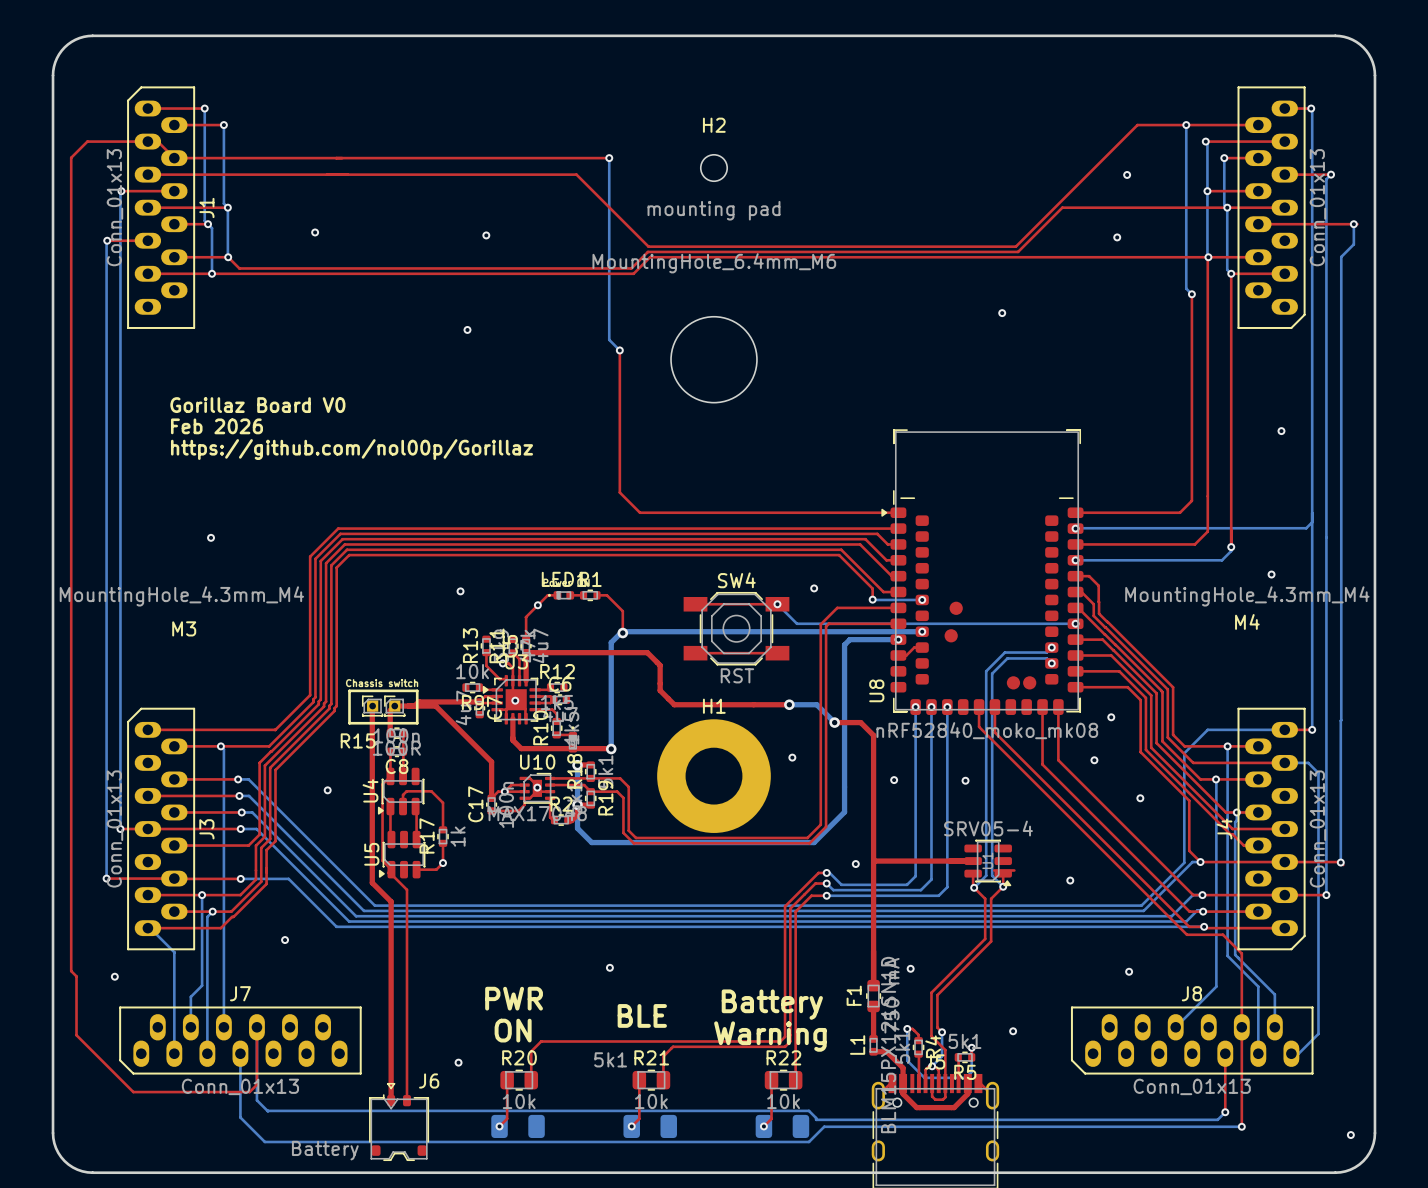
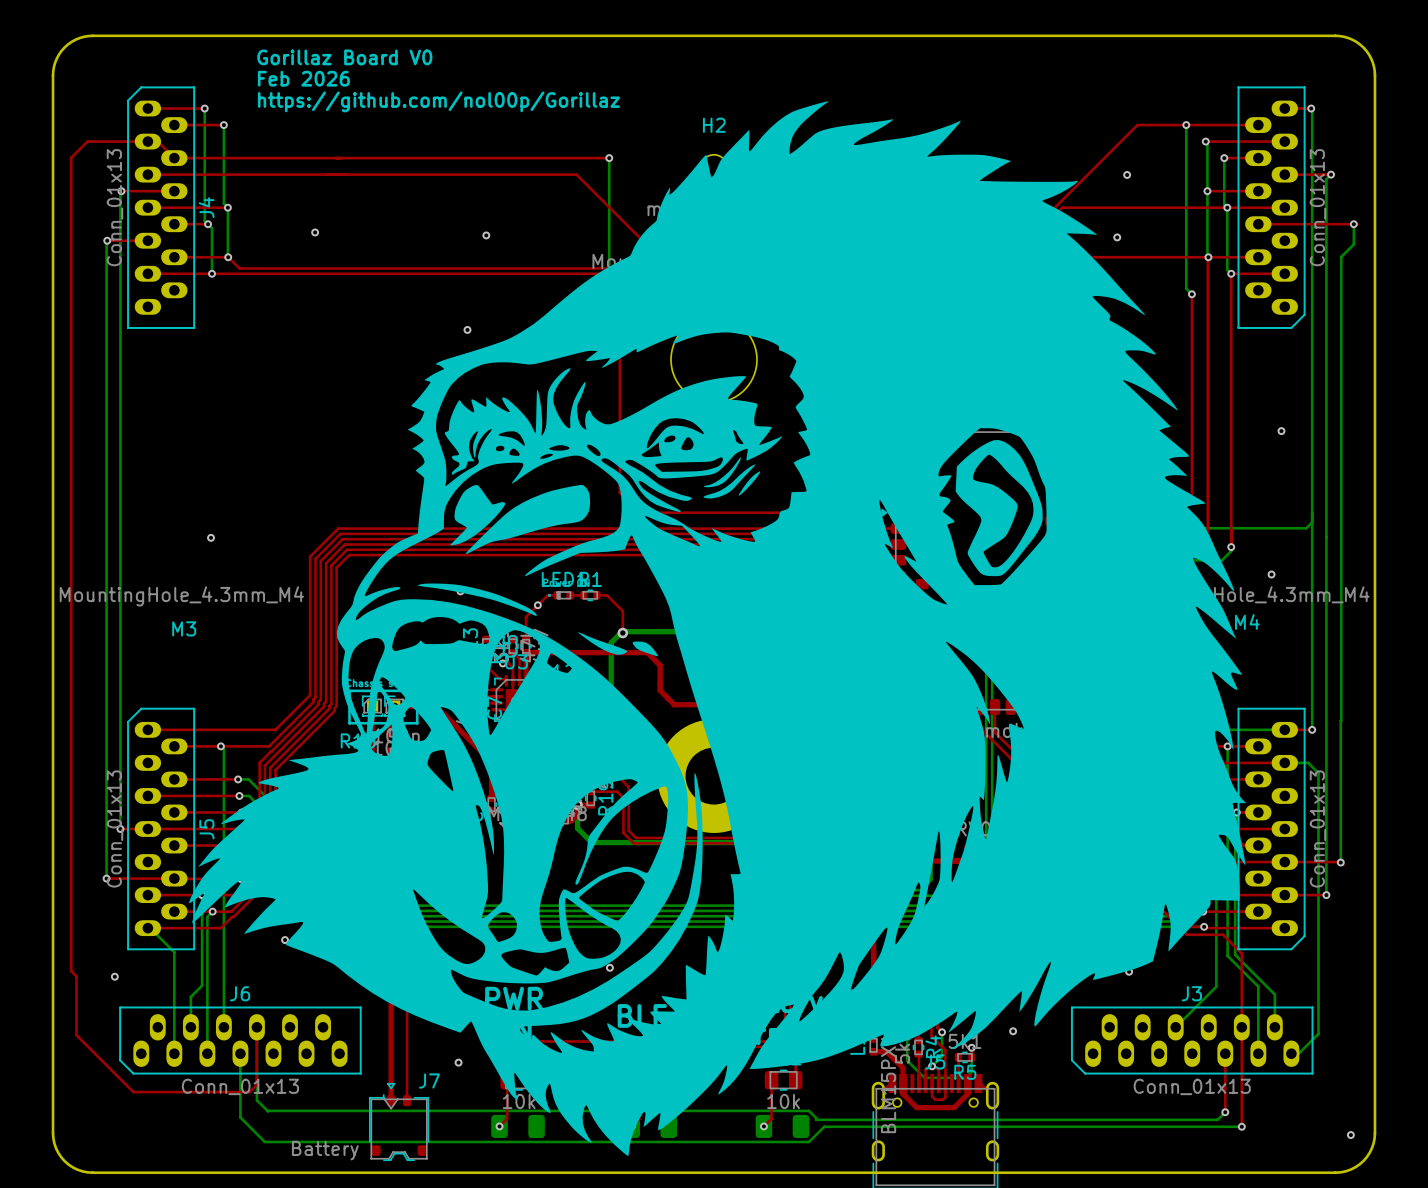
text: none -> Gorillaz Board V0 (344, 57)
text: none -> Feb 2026 (303, 78)
text: none -> https://github.com/nol00p/Gorillaz (438, 101)
J1 name: J1 (206, 208) -> J4 (206, 207)
text: Gorillaz Board V0 (257, 405) -> none
text: Feb 2026 (216, 426) -> none
text: https://github.com/nol00p/Gorillaz (352, 449) -> none
part: none -> (717, 628)
J3 name: J3 (206, 829) -> J5 (206, 829)
J7 name: J7 (240, 993) -> J6 (240, 993)
J8 name: J8 (1191, 993) -> J3 (1191, 993)
J6 name: J6 (429, 1081) -> J7 (429, 1081)

